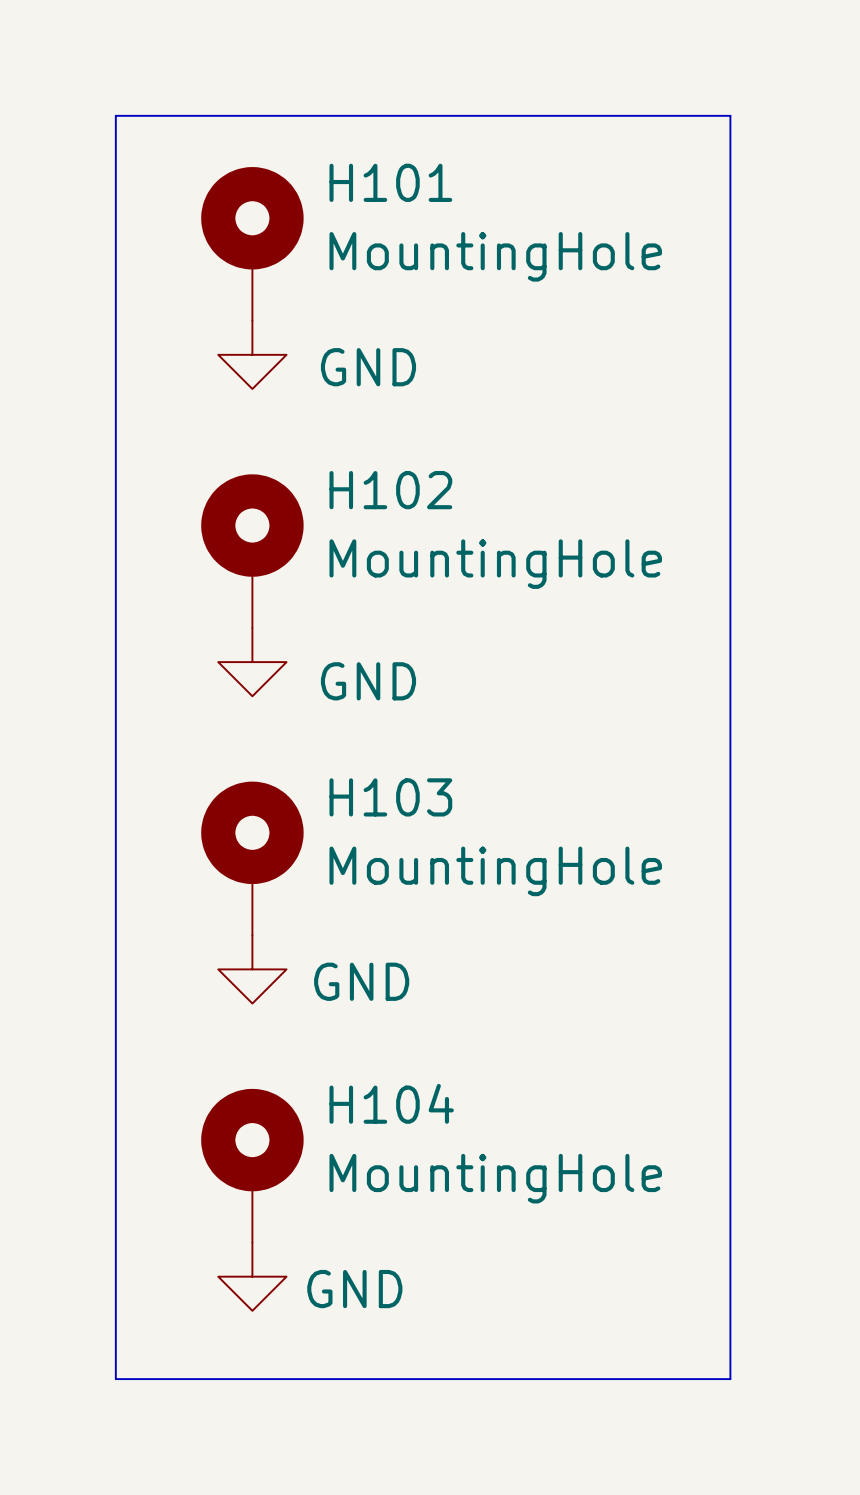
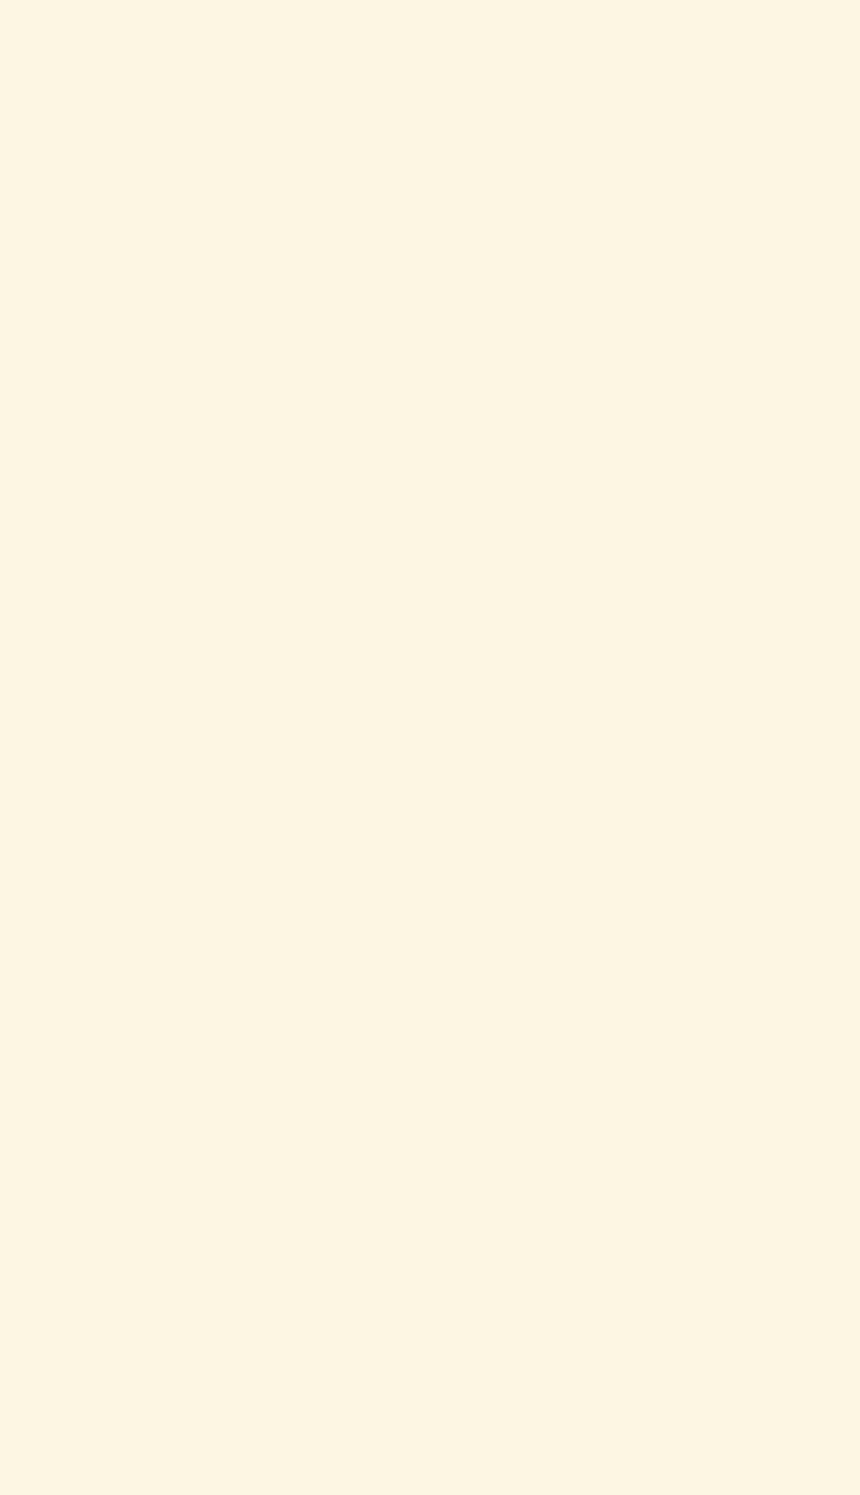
line: (115, 115) (730, 115) (730, 1379) (115, 1379) (115, 115) -> none
H101: MountingHole (252, 243) -> none
power symbol: GND (252, 354) -> none
H102: MountingHole (252, 551) -> none
power symbol: GND (252, 662) -> none
H103: MountingHole (252, 858) -> none
power symbol: GND (252, 969) -> none
H104: MountingHole (252, 1165) -> none
power symbol: GND (252, 1276) -> none

